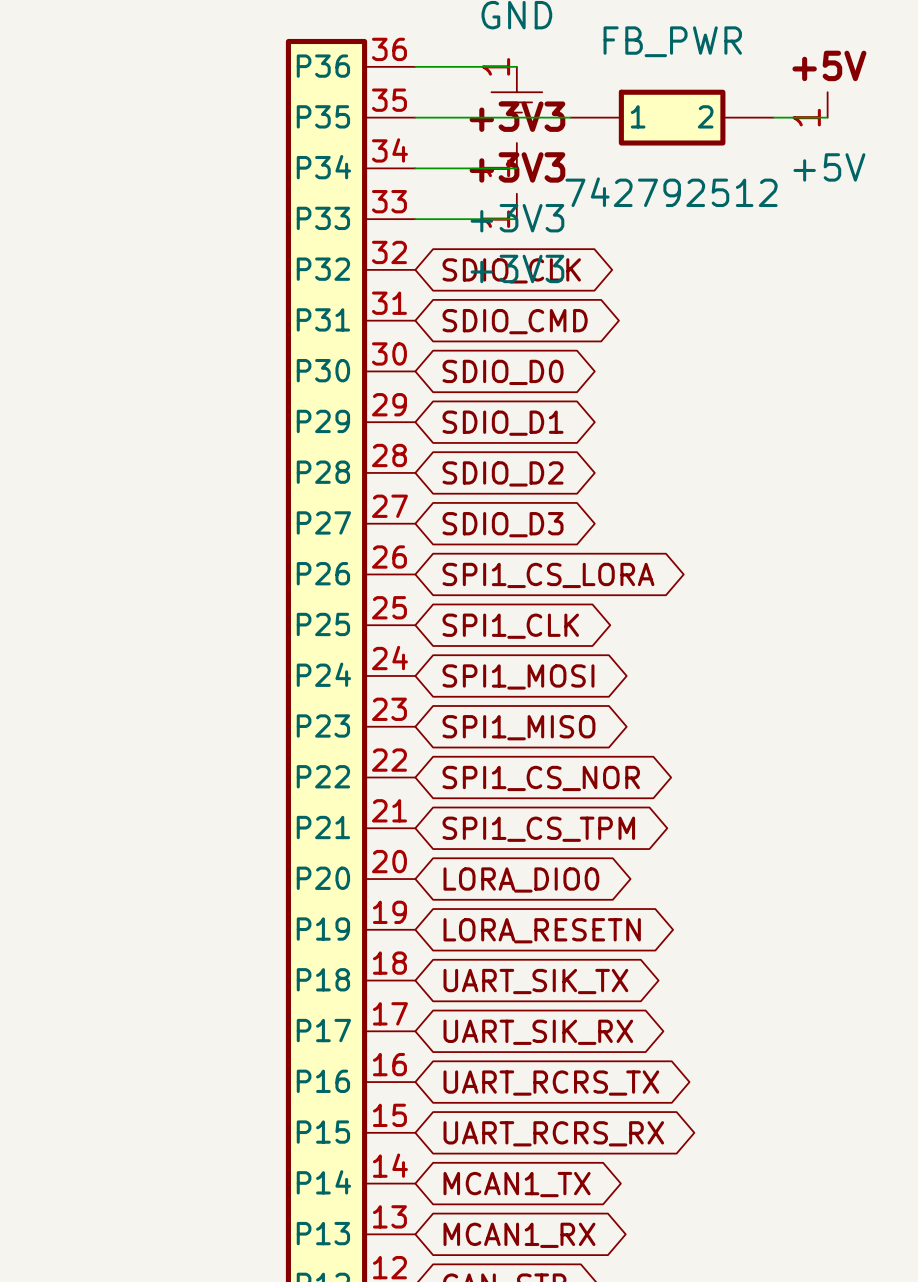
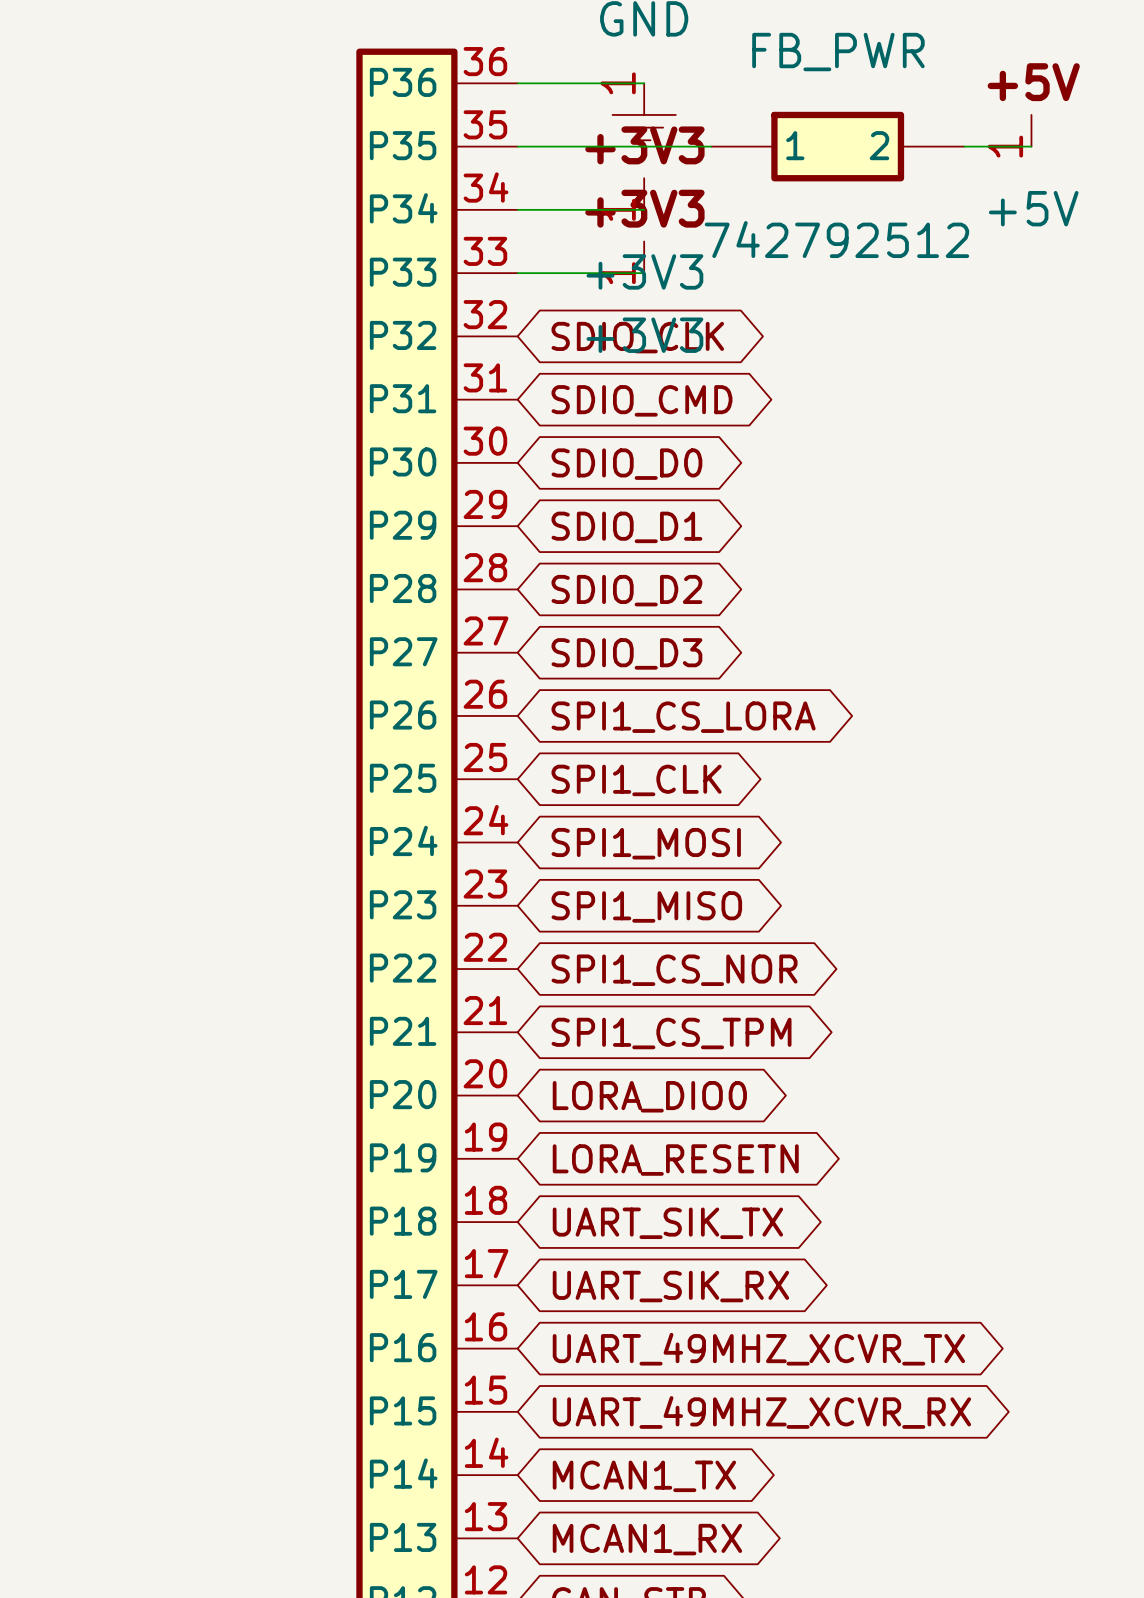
global label: UART_RCRS_TX (551, 1083) -> UART_49MHZ_XCVR_TX (758, 1349)
global label: UART_RCRS_RX (553, 1133) -> UART_49MHZ_XCVR_RX (761, 1412)

